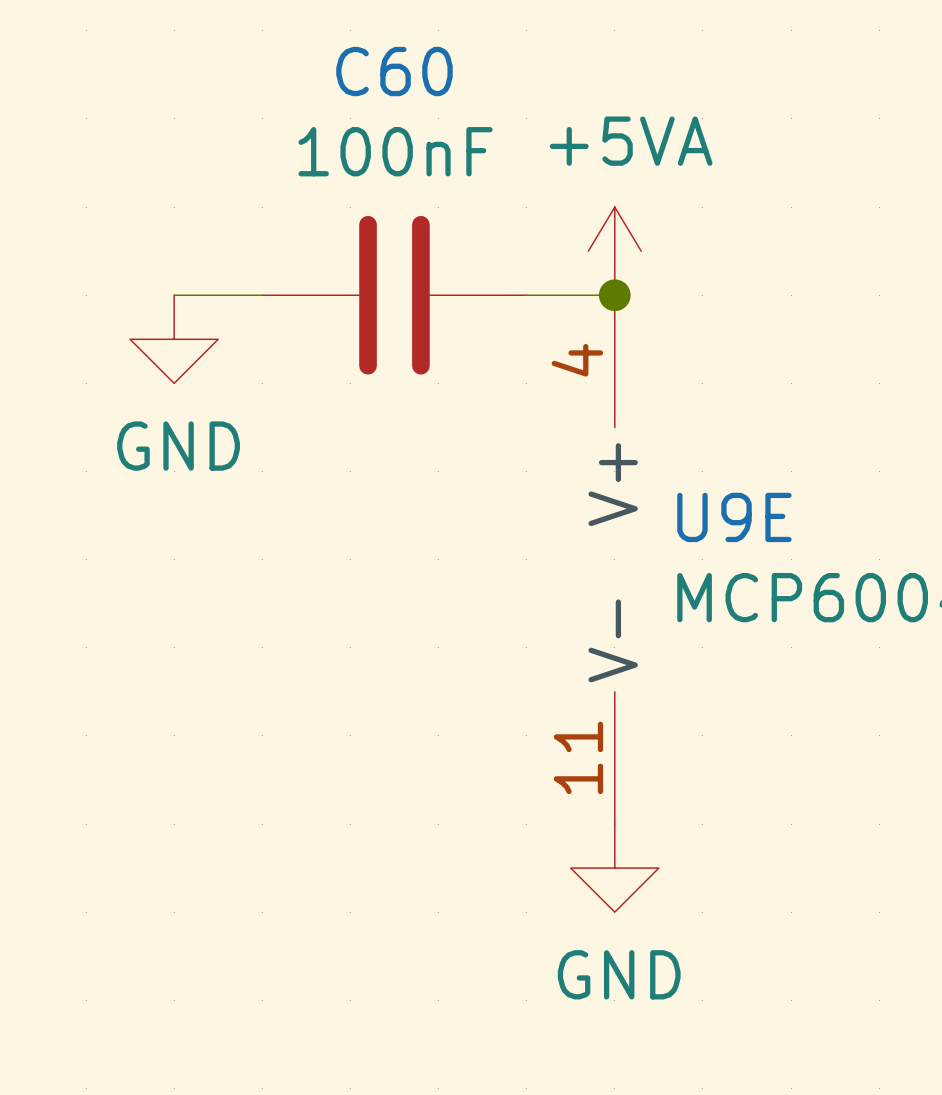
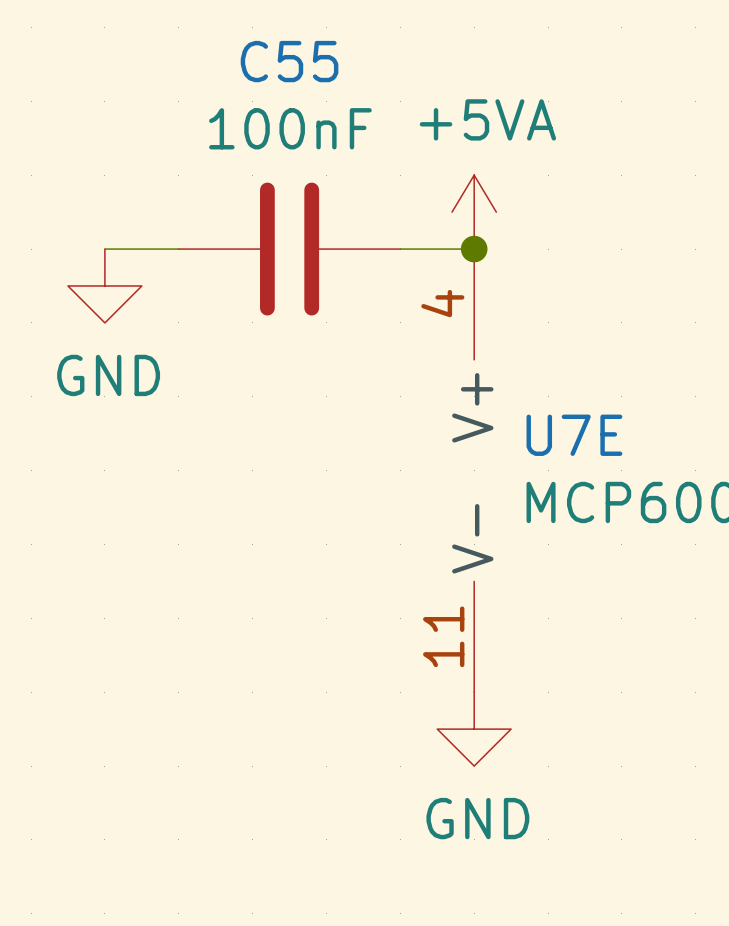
C60 name: C60 (394, 71) -> C55 (289, 61)
U9E name: U9E (734, 517) -> U7E (574, 435)

